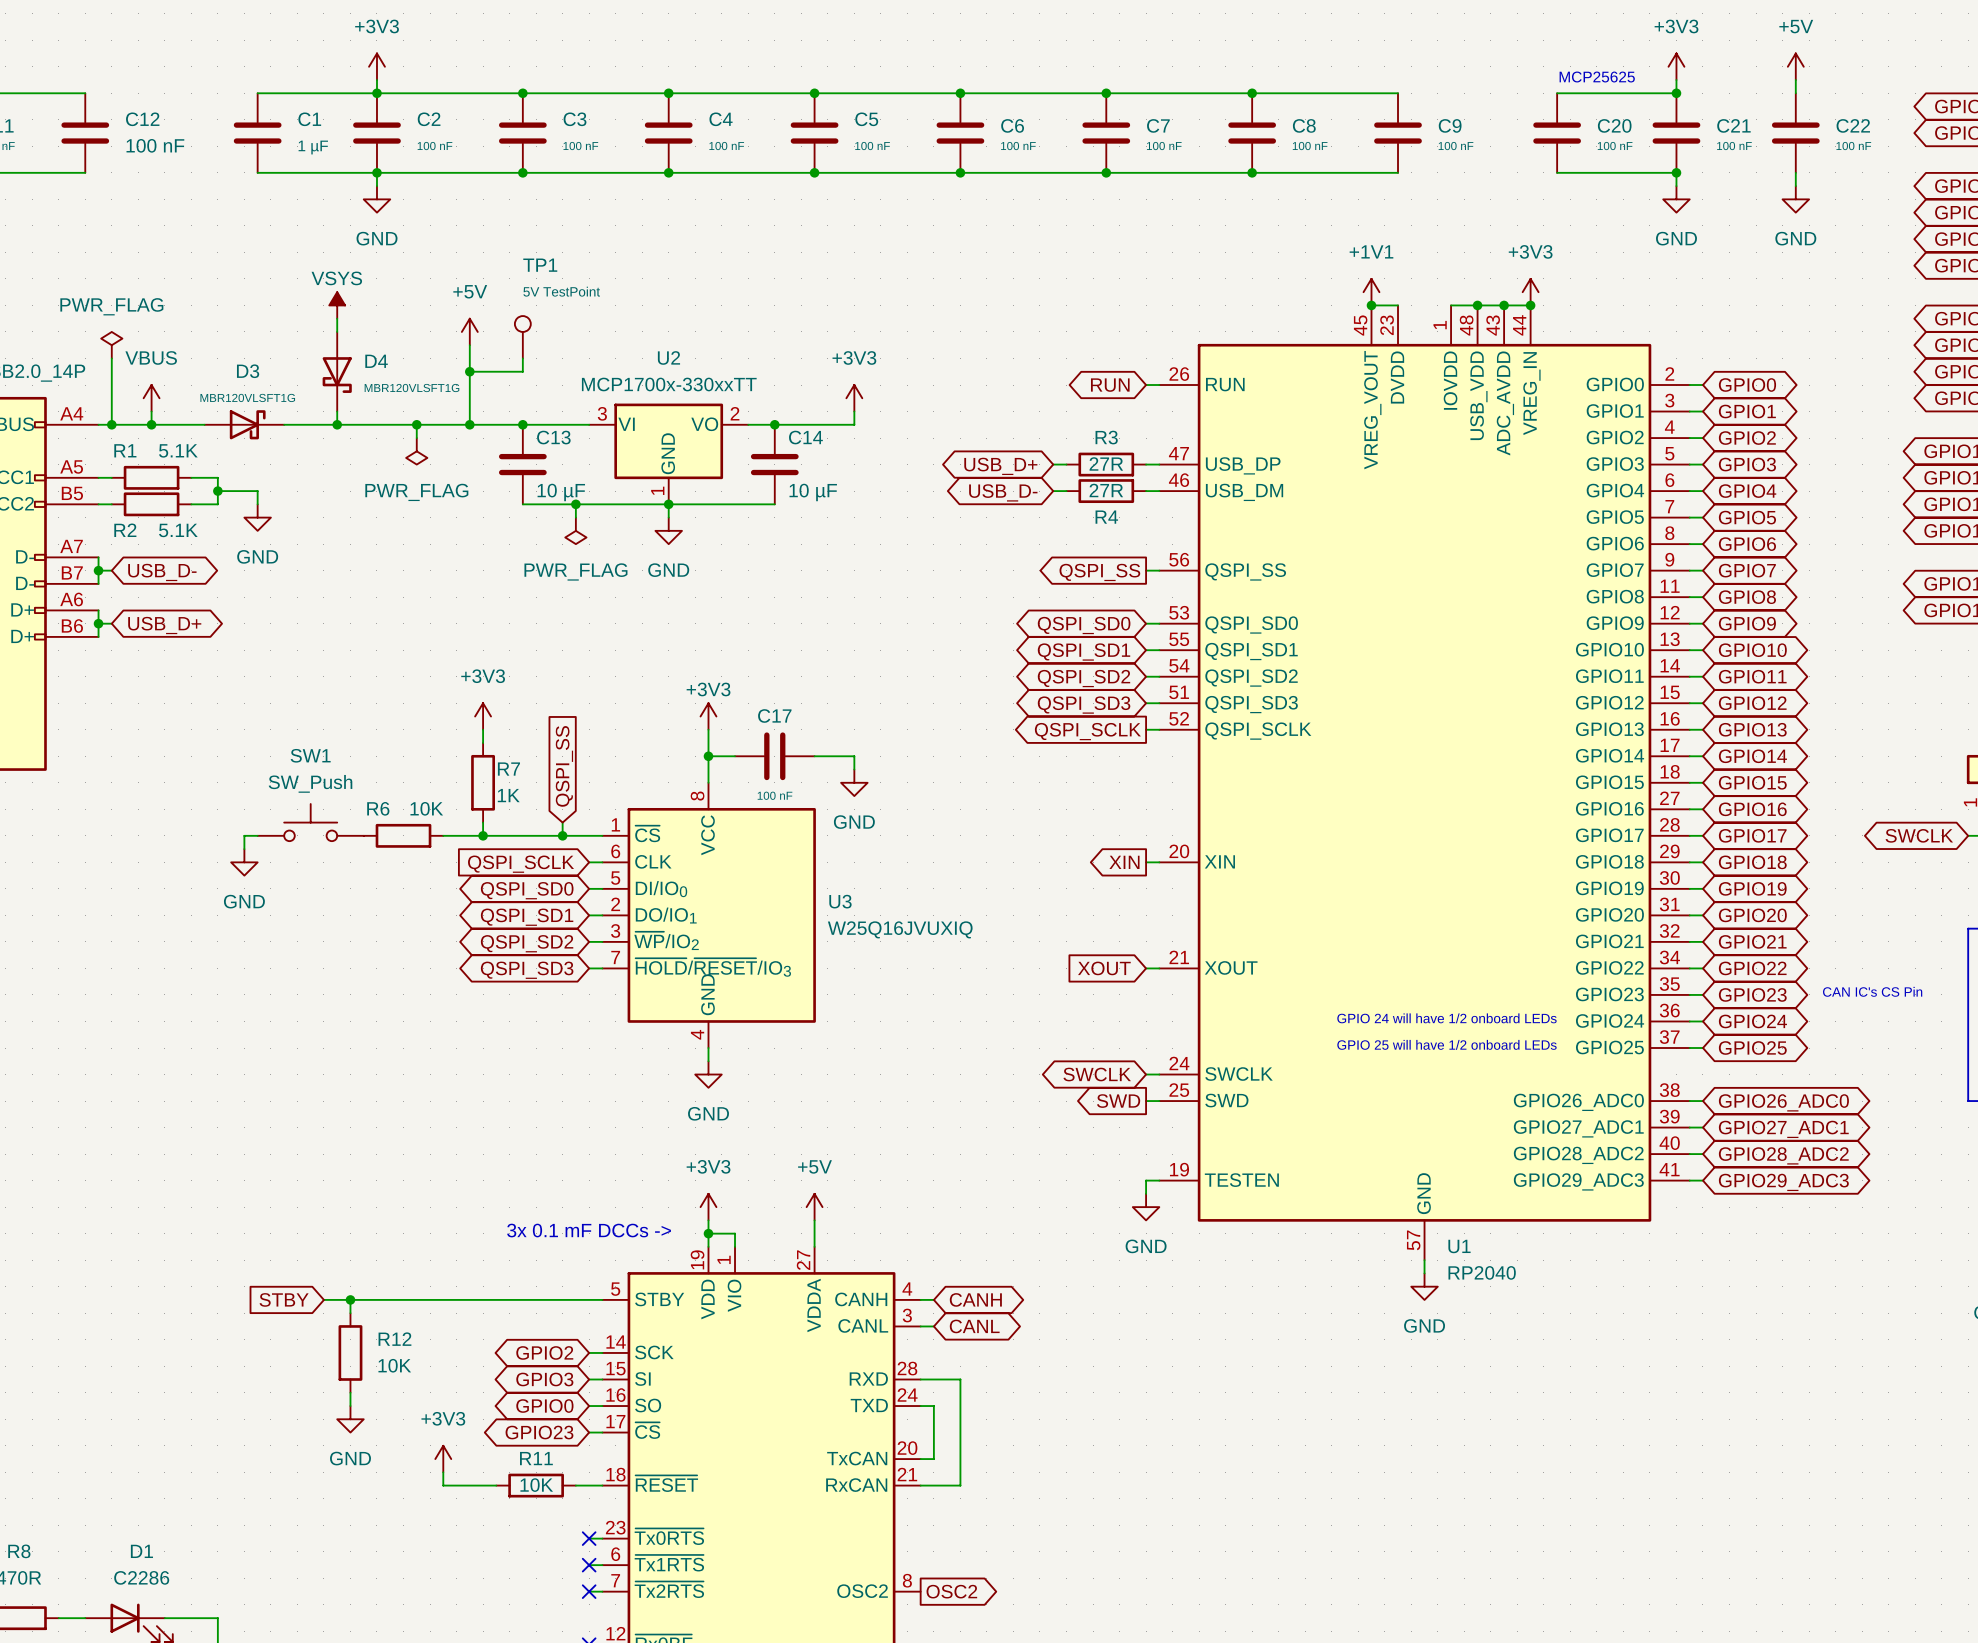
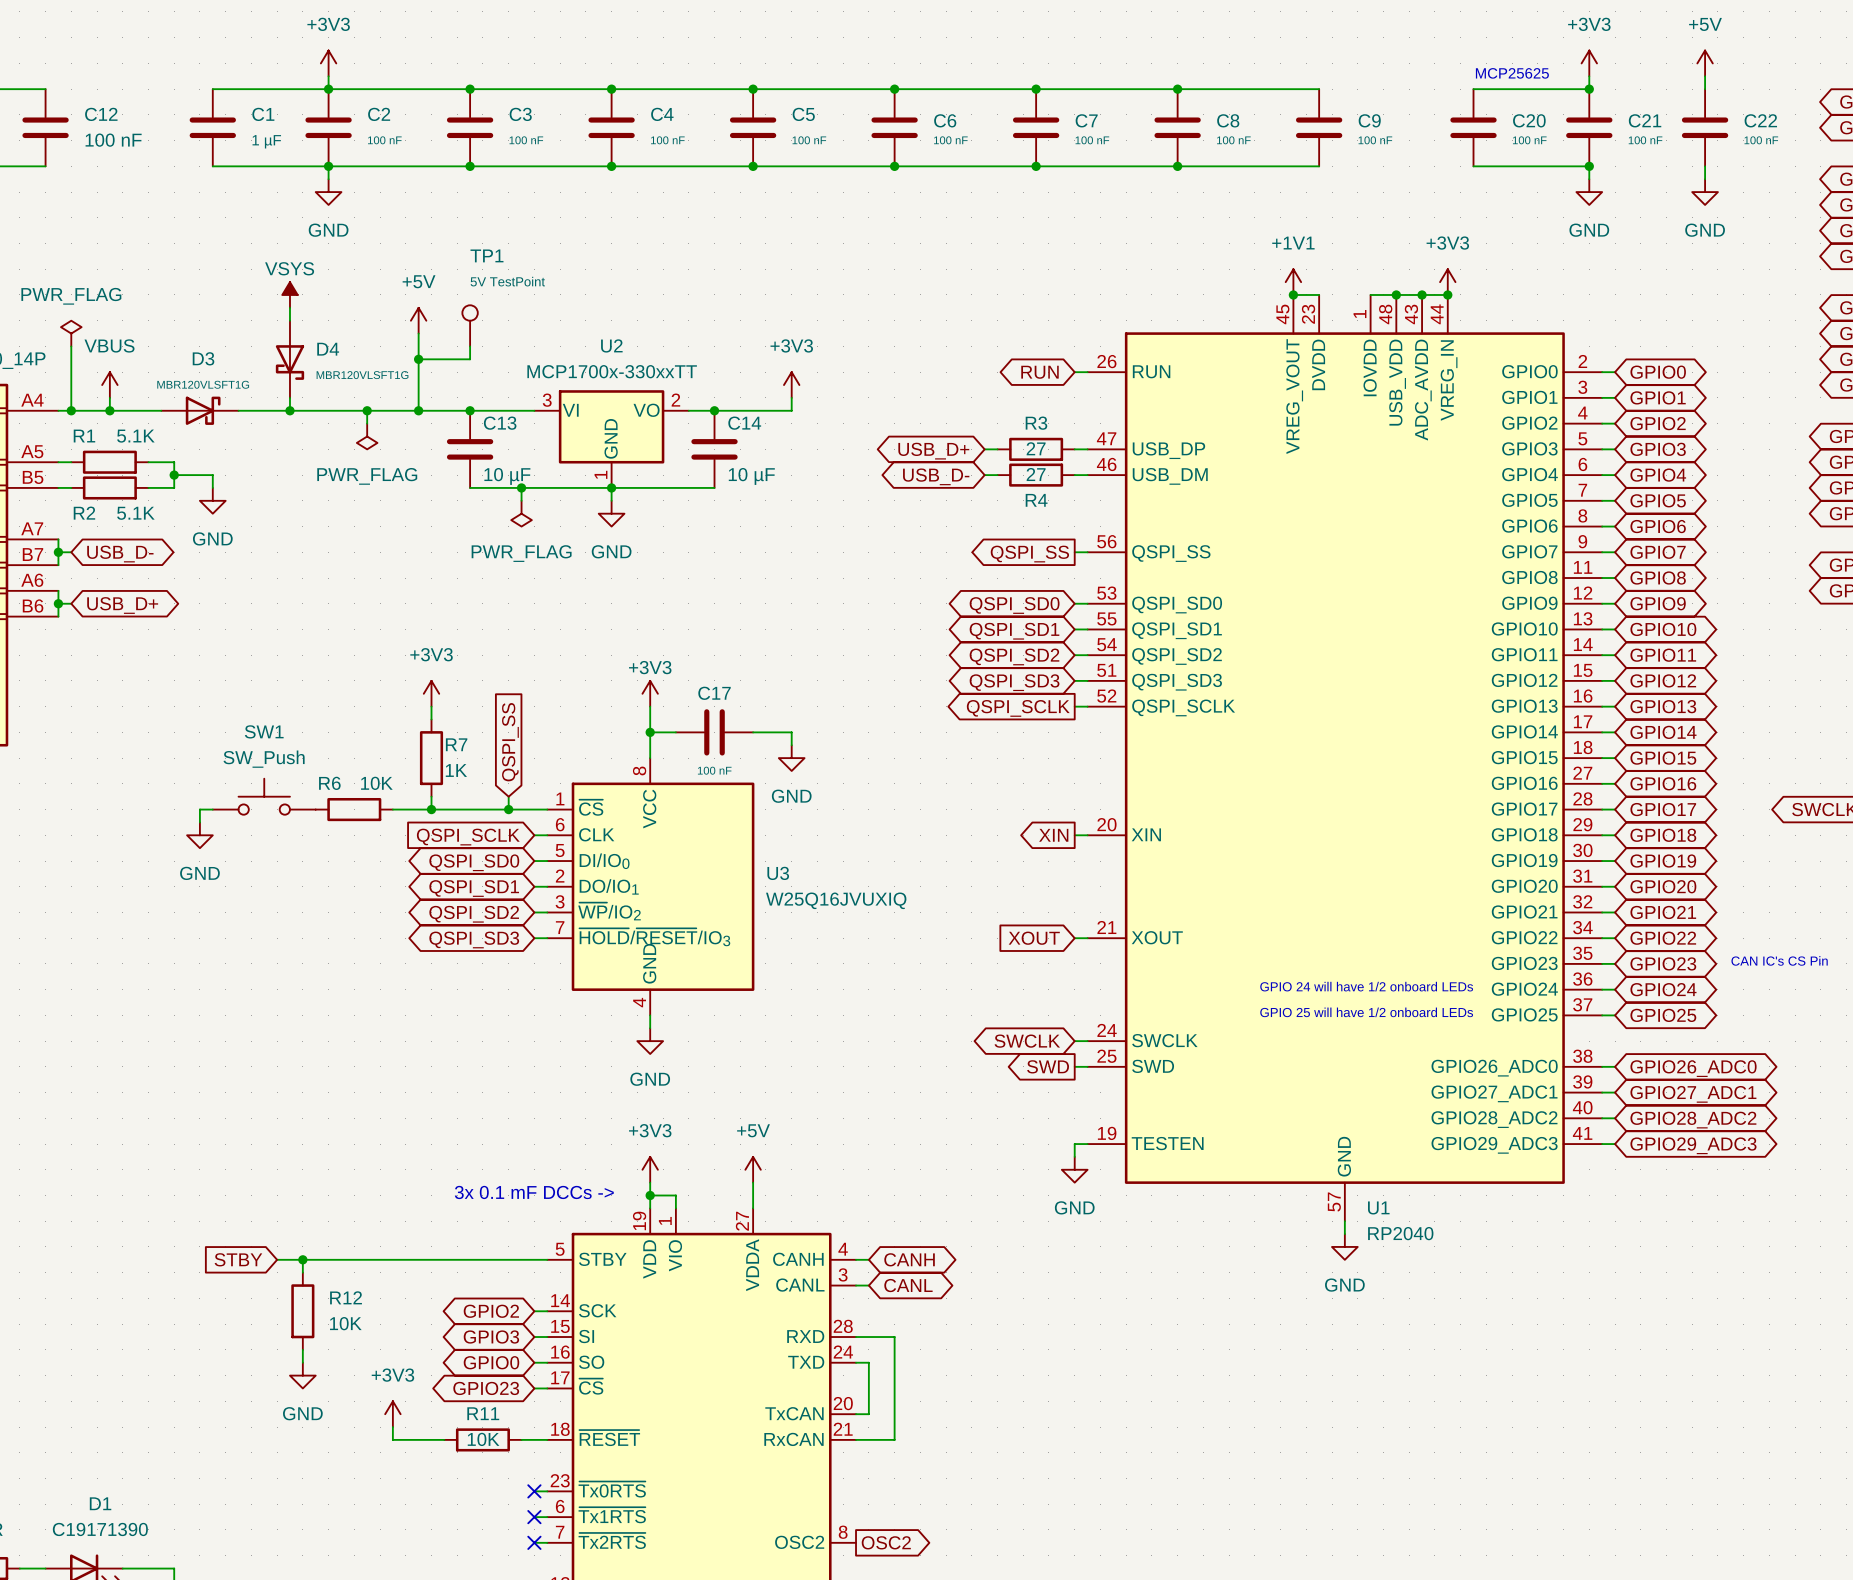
R3 value: 27R (1106, 463) -> 27 (1036, 448)
R4 value: 27R (1106, 490) -> 27 (1036, 474)
D1 value: C2286 (141, 1577) -> C19171390 (100, 1529)

